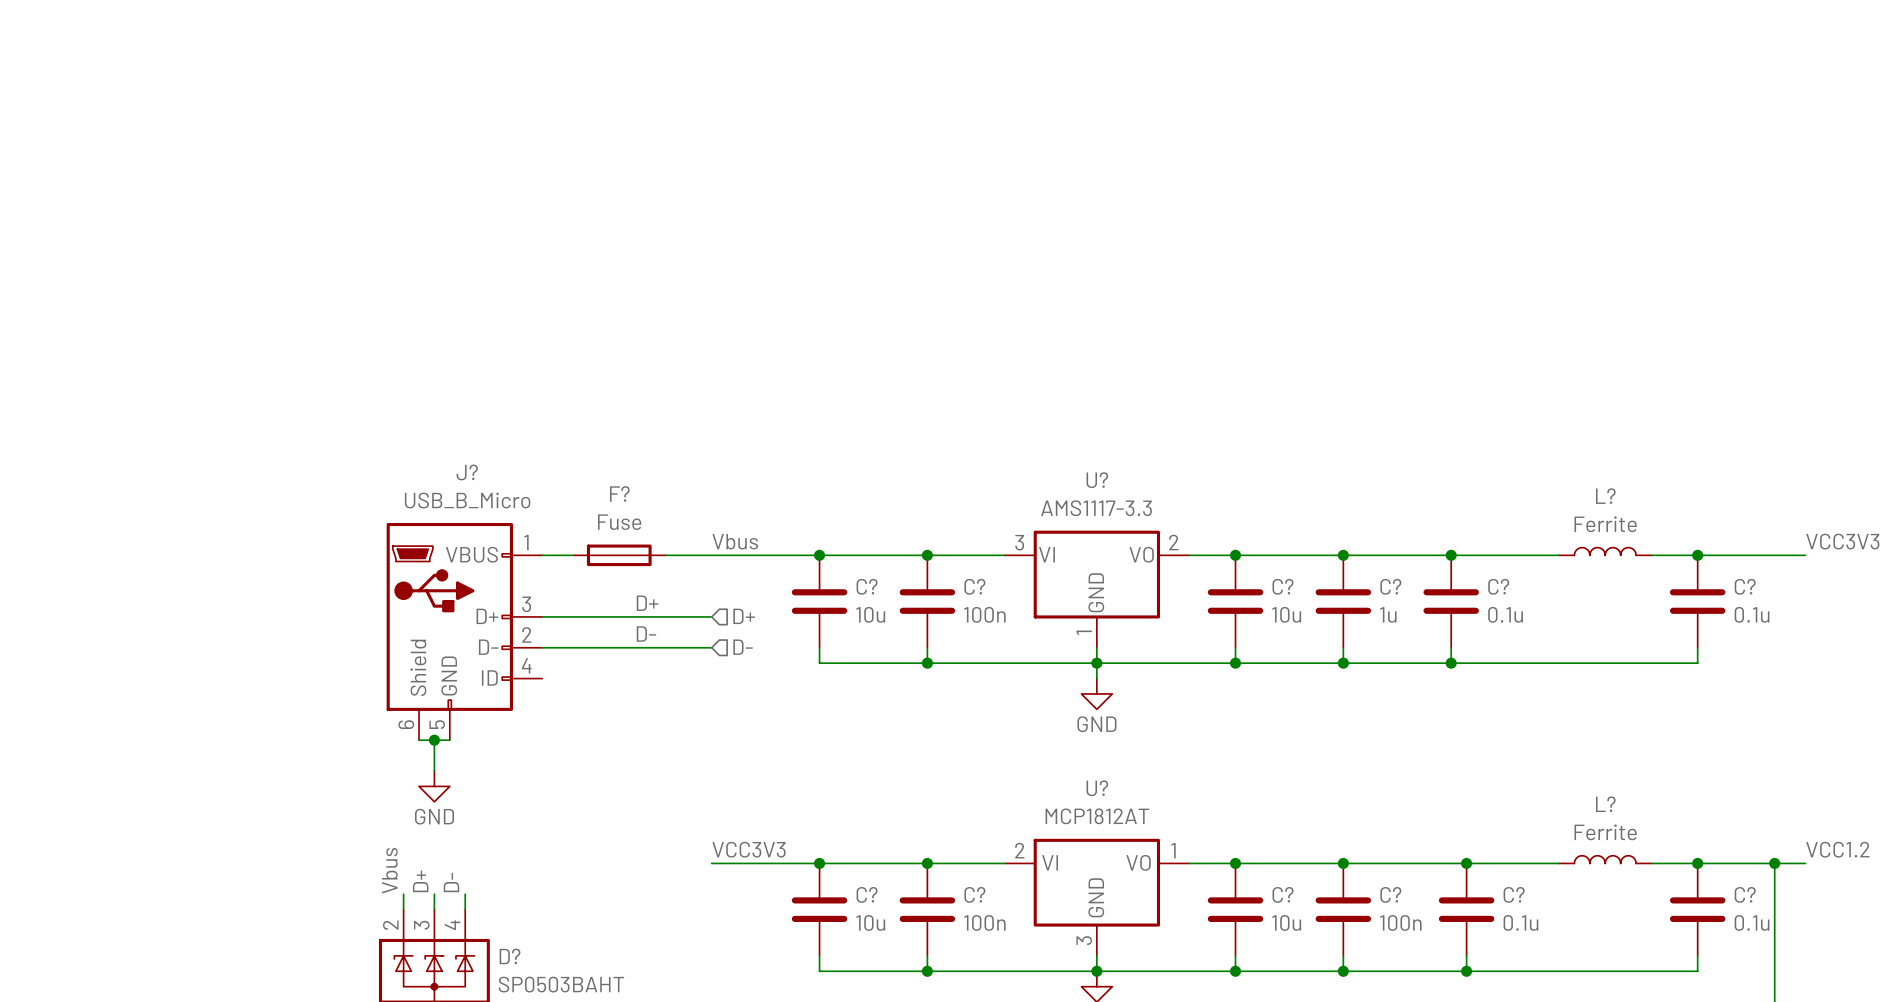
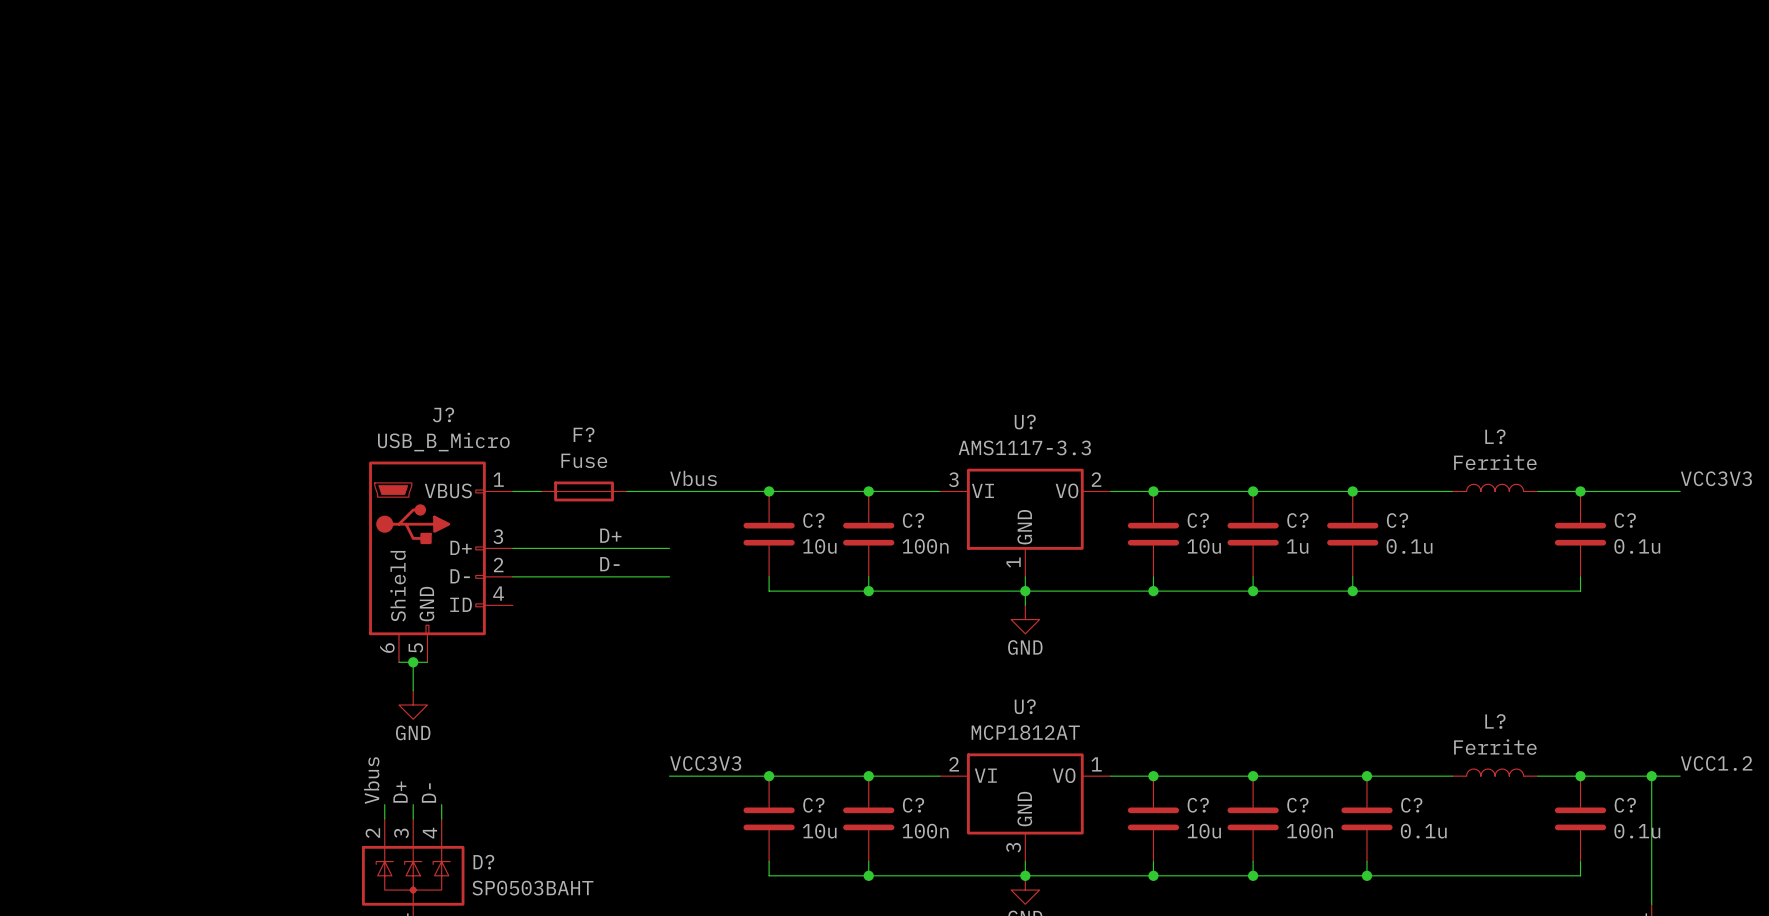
hierarchical label: D+ (744, 616) -> none
hierarchical label: D- (743, 647) -> none

